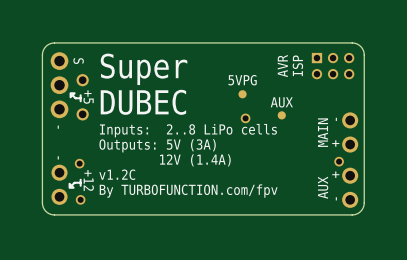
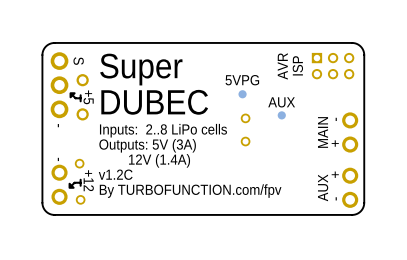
part position: (339, 161) -> (245, 141)

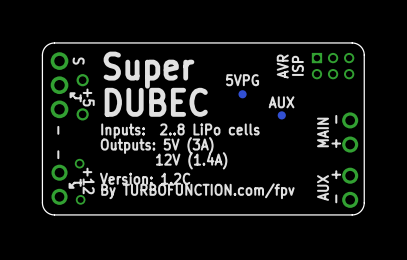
part: (245, 118) -> none
part: (245, 141) -> none
text: v1.2C (115, 174) -> Version: 1.2C (145, 178)

